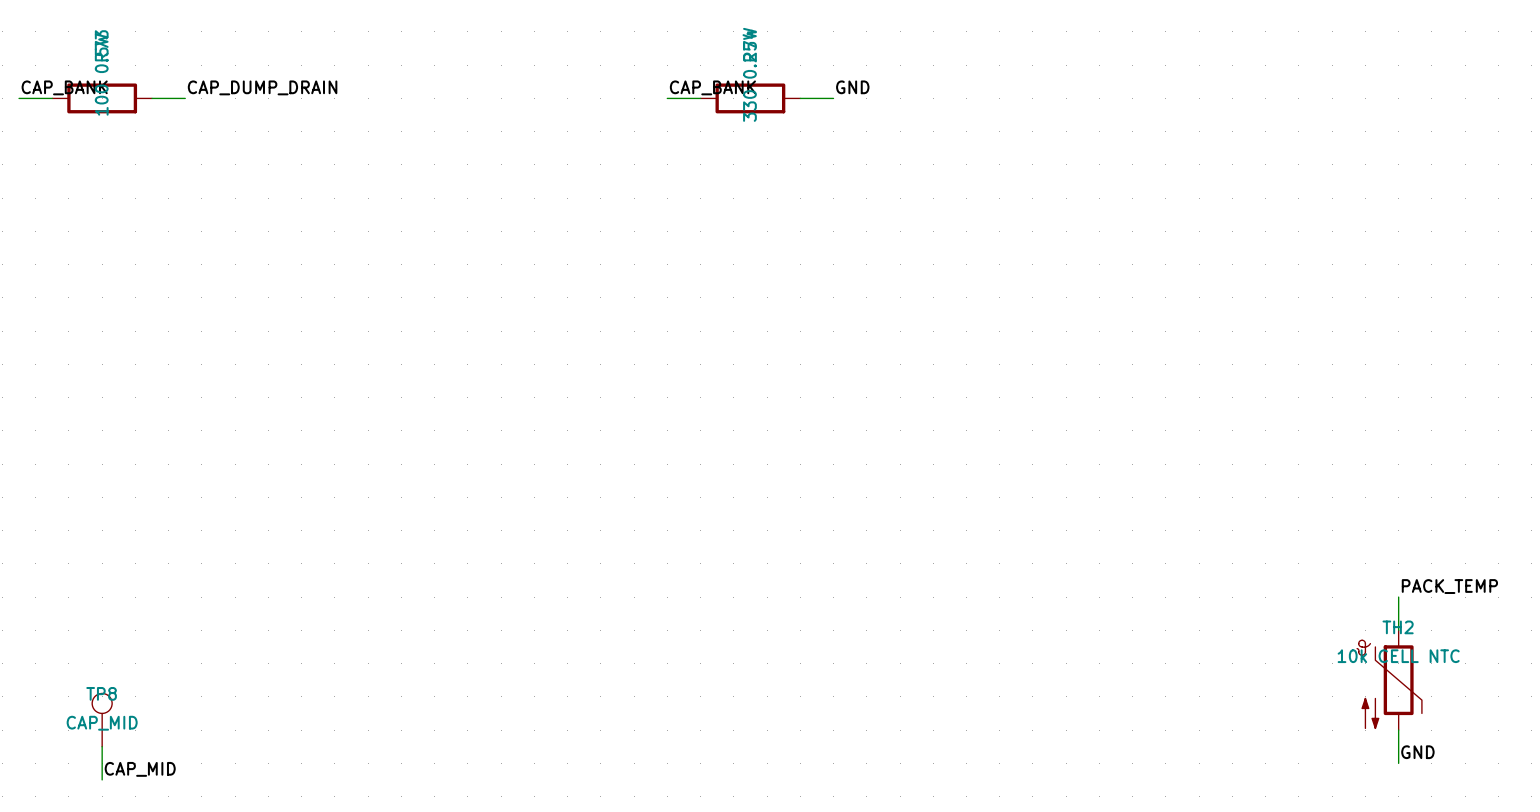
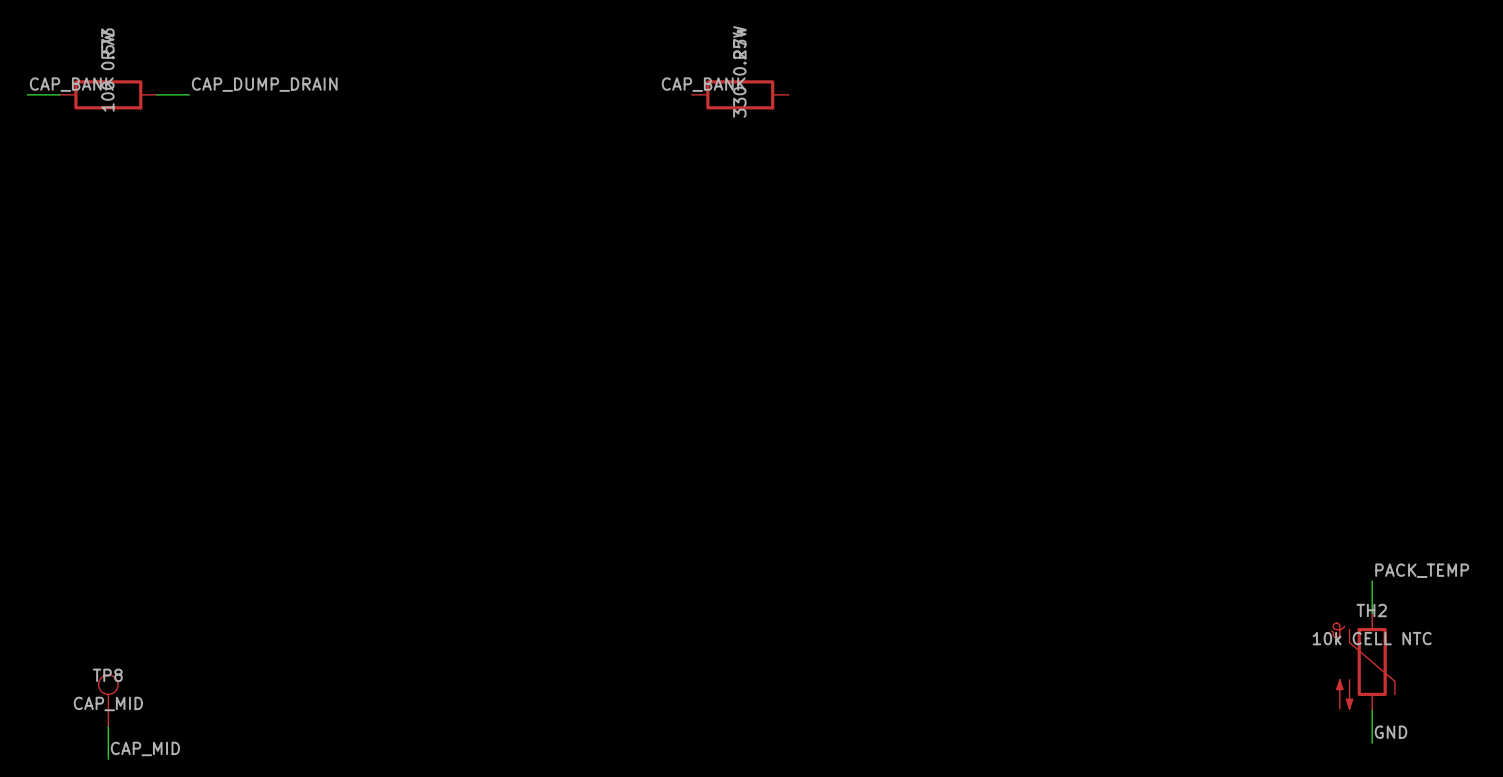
label: GND (852, 87) -> none
wire: (667, 98) (700, 98) -> none
wire: (800, 98) (833, 98) -> none

